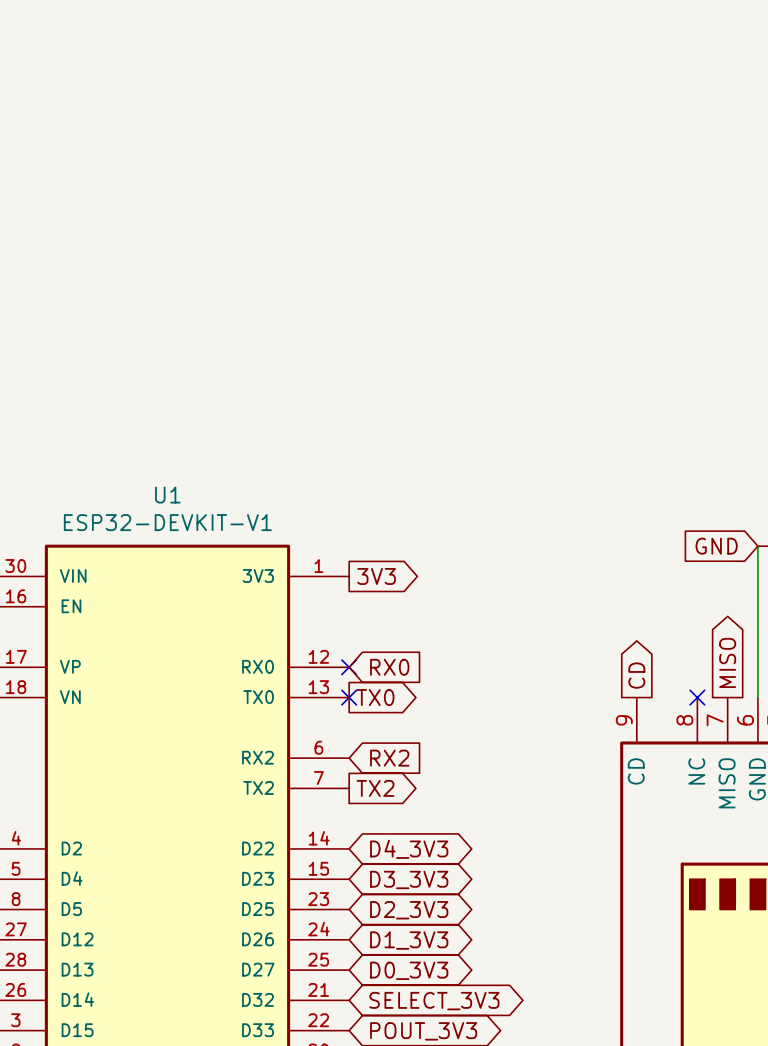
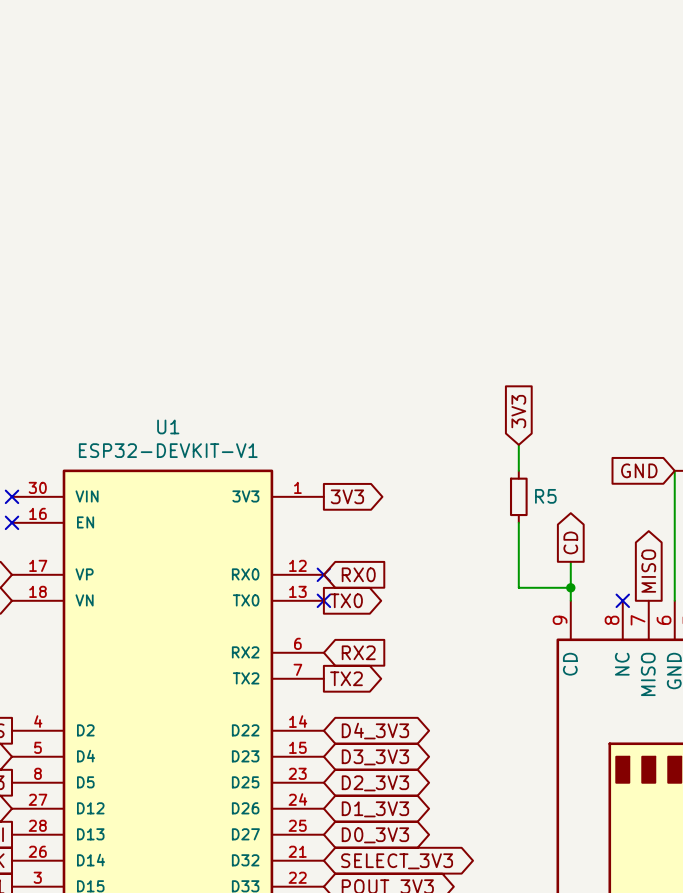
global label: none -> 3V3 (518, 411)
wire: none -> (518, 444) (518, 470)
R5: none -> (518, 496)
wire: none -> (518, 522) (518, 587) (570, 587)
wire: none -> (570, 561) (570, 600)
global label position: CD (636, 675) -> CD (570, 542)
junction: none -> (570, 587)

